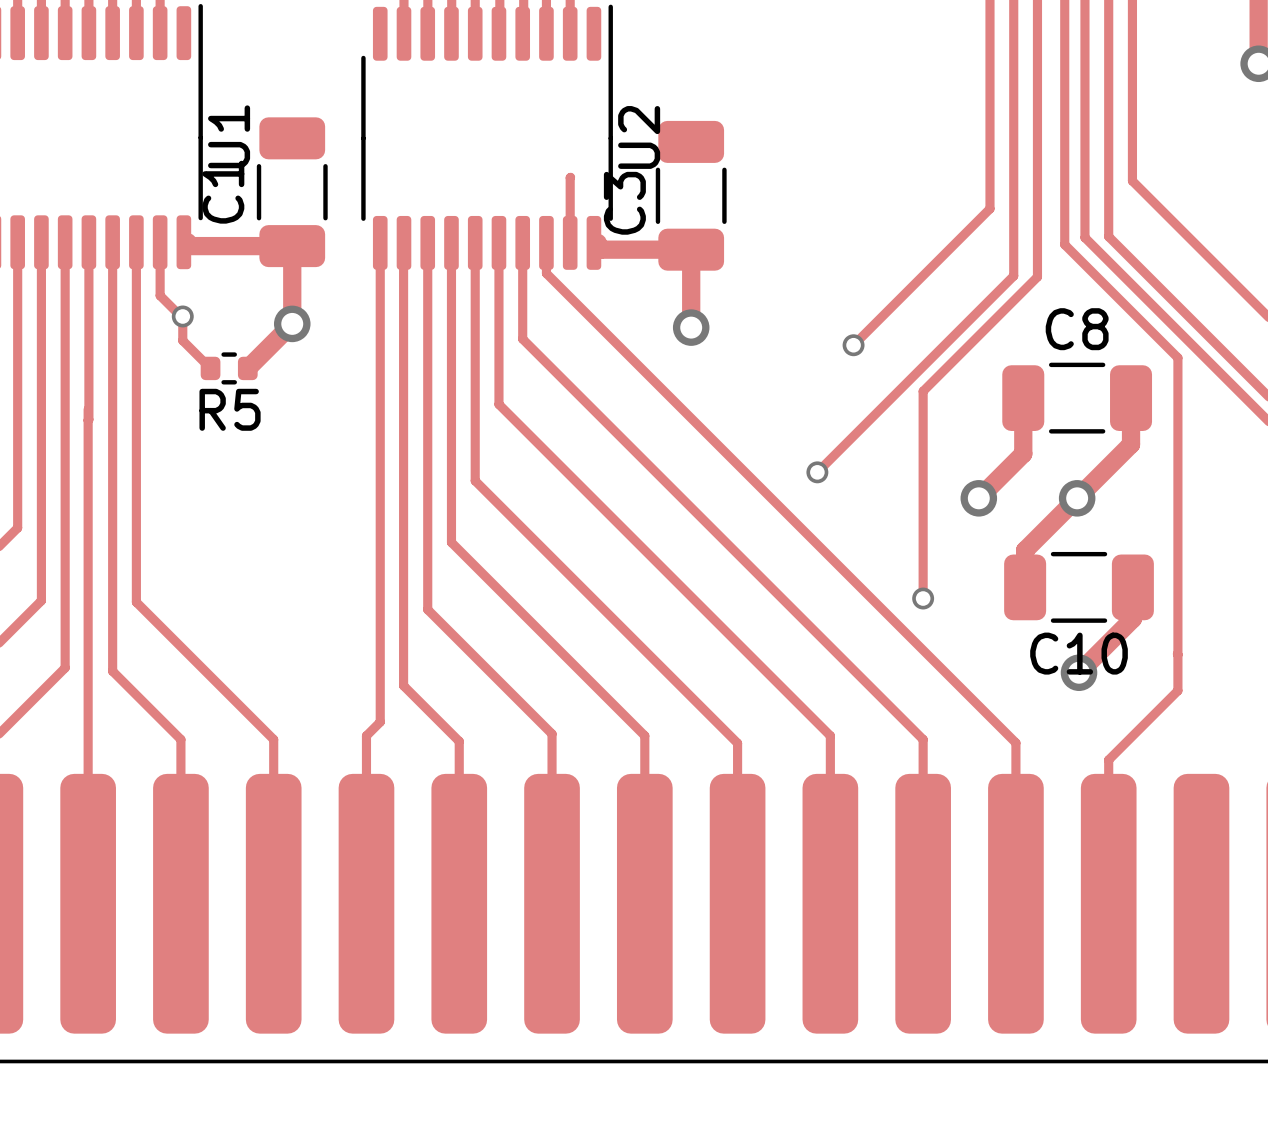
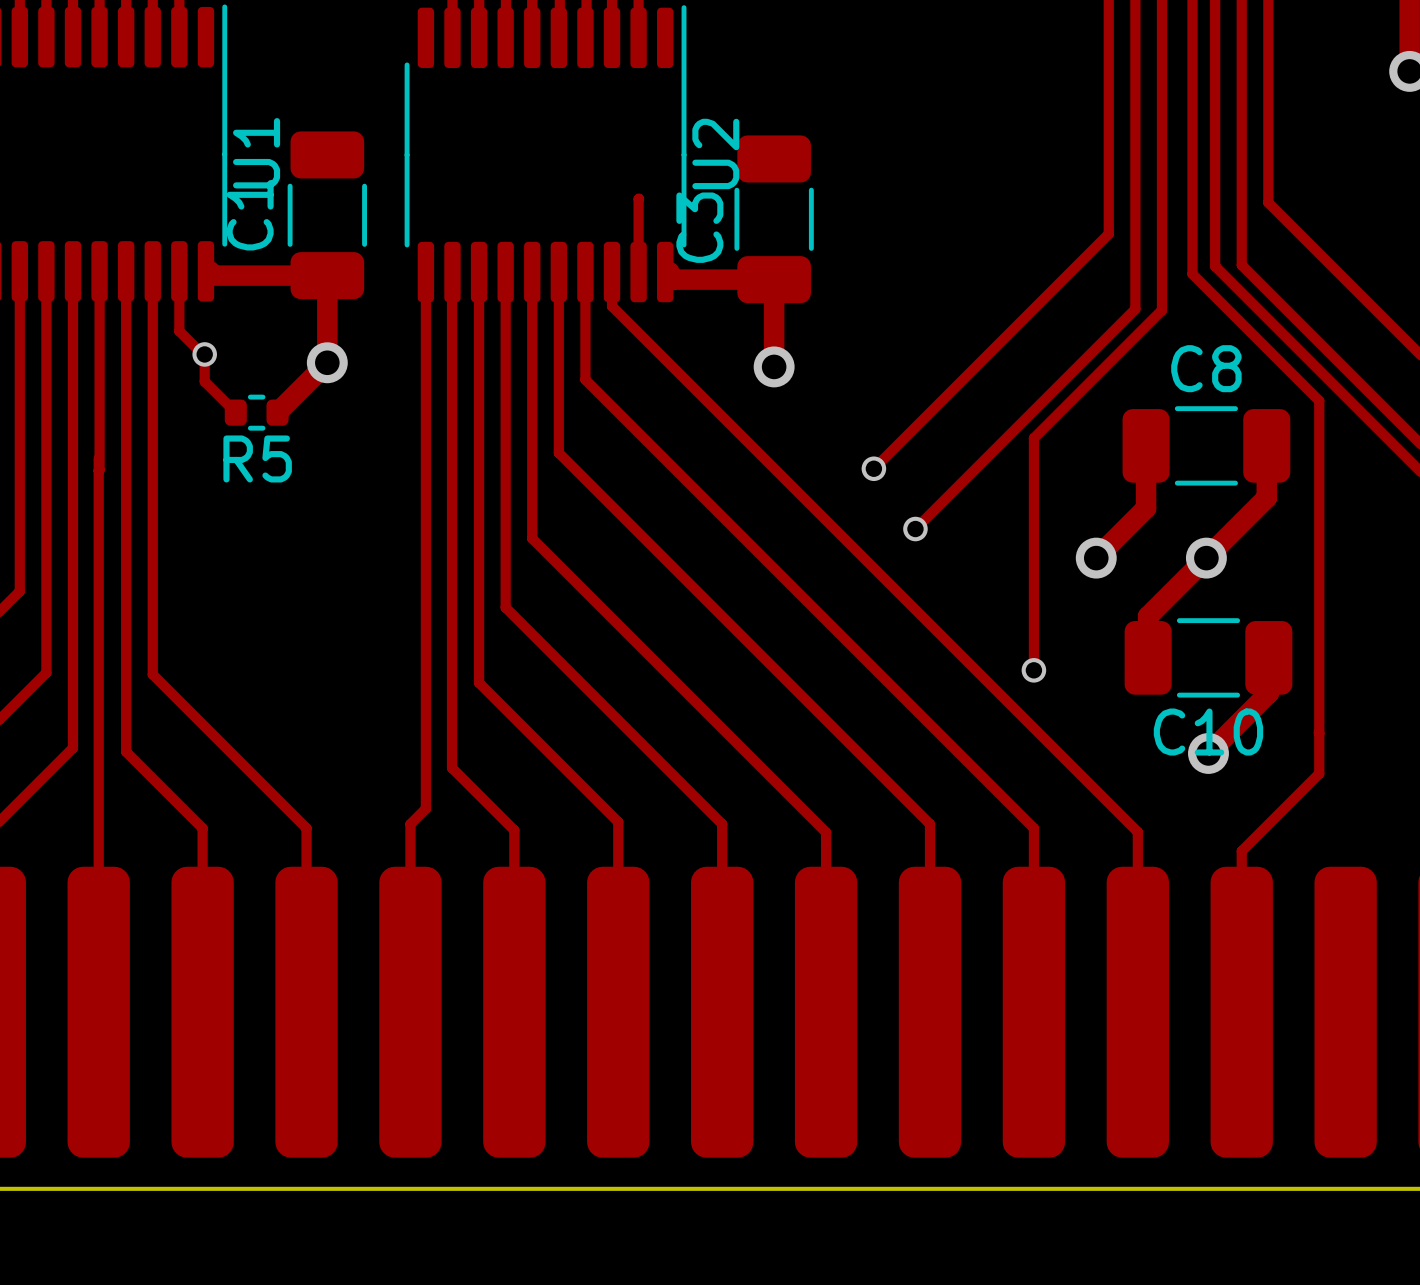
track: none -> (955, 386) (873, 468)
via position: (853, 345) -> (873, 468)

